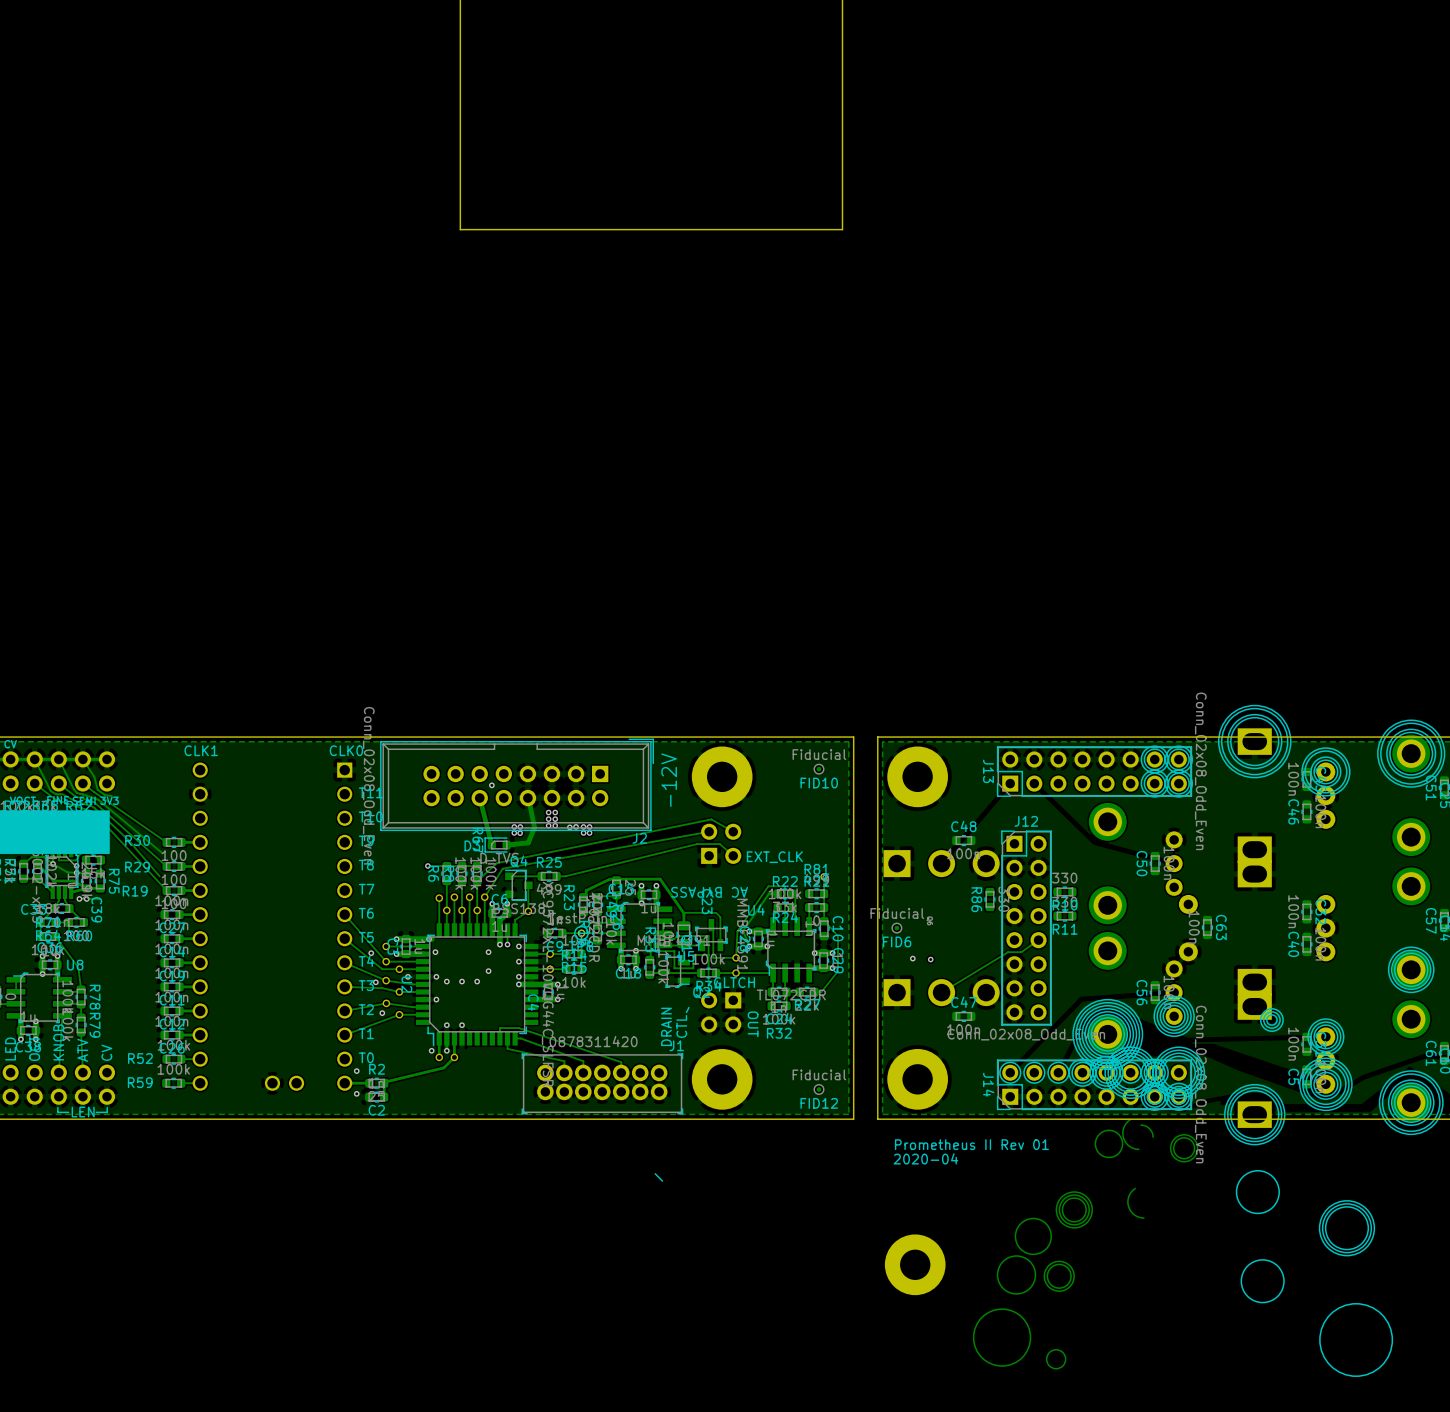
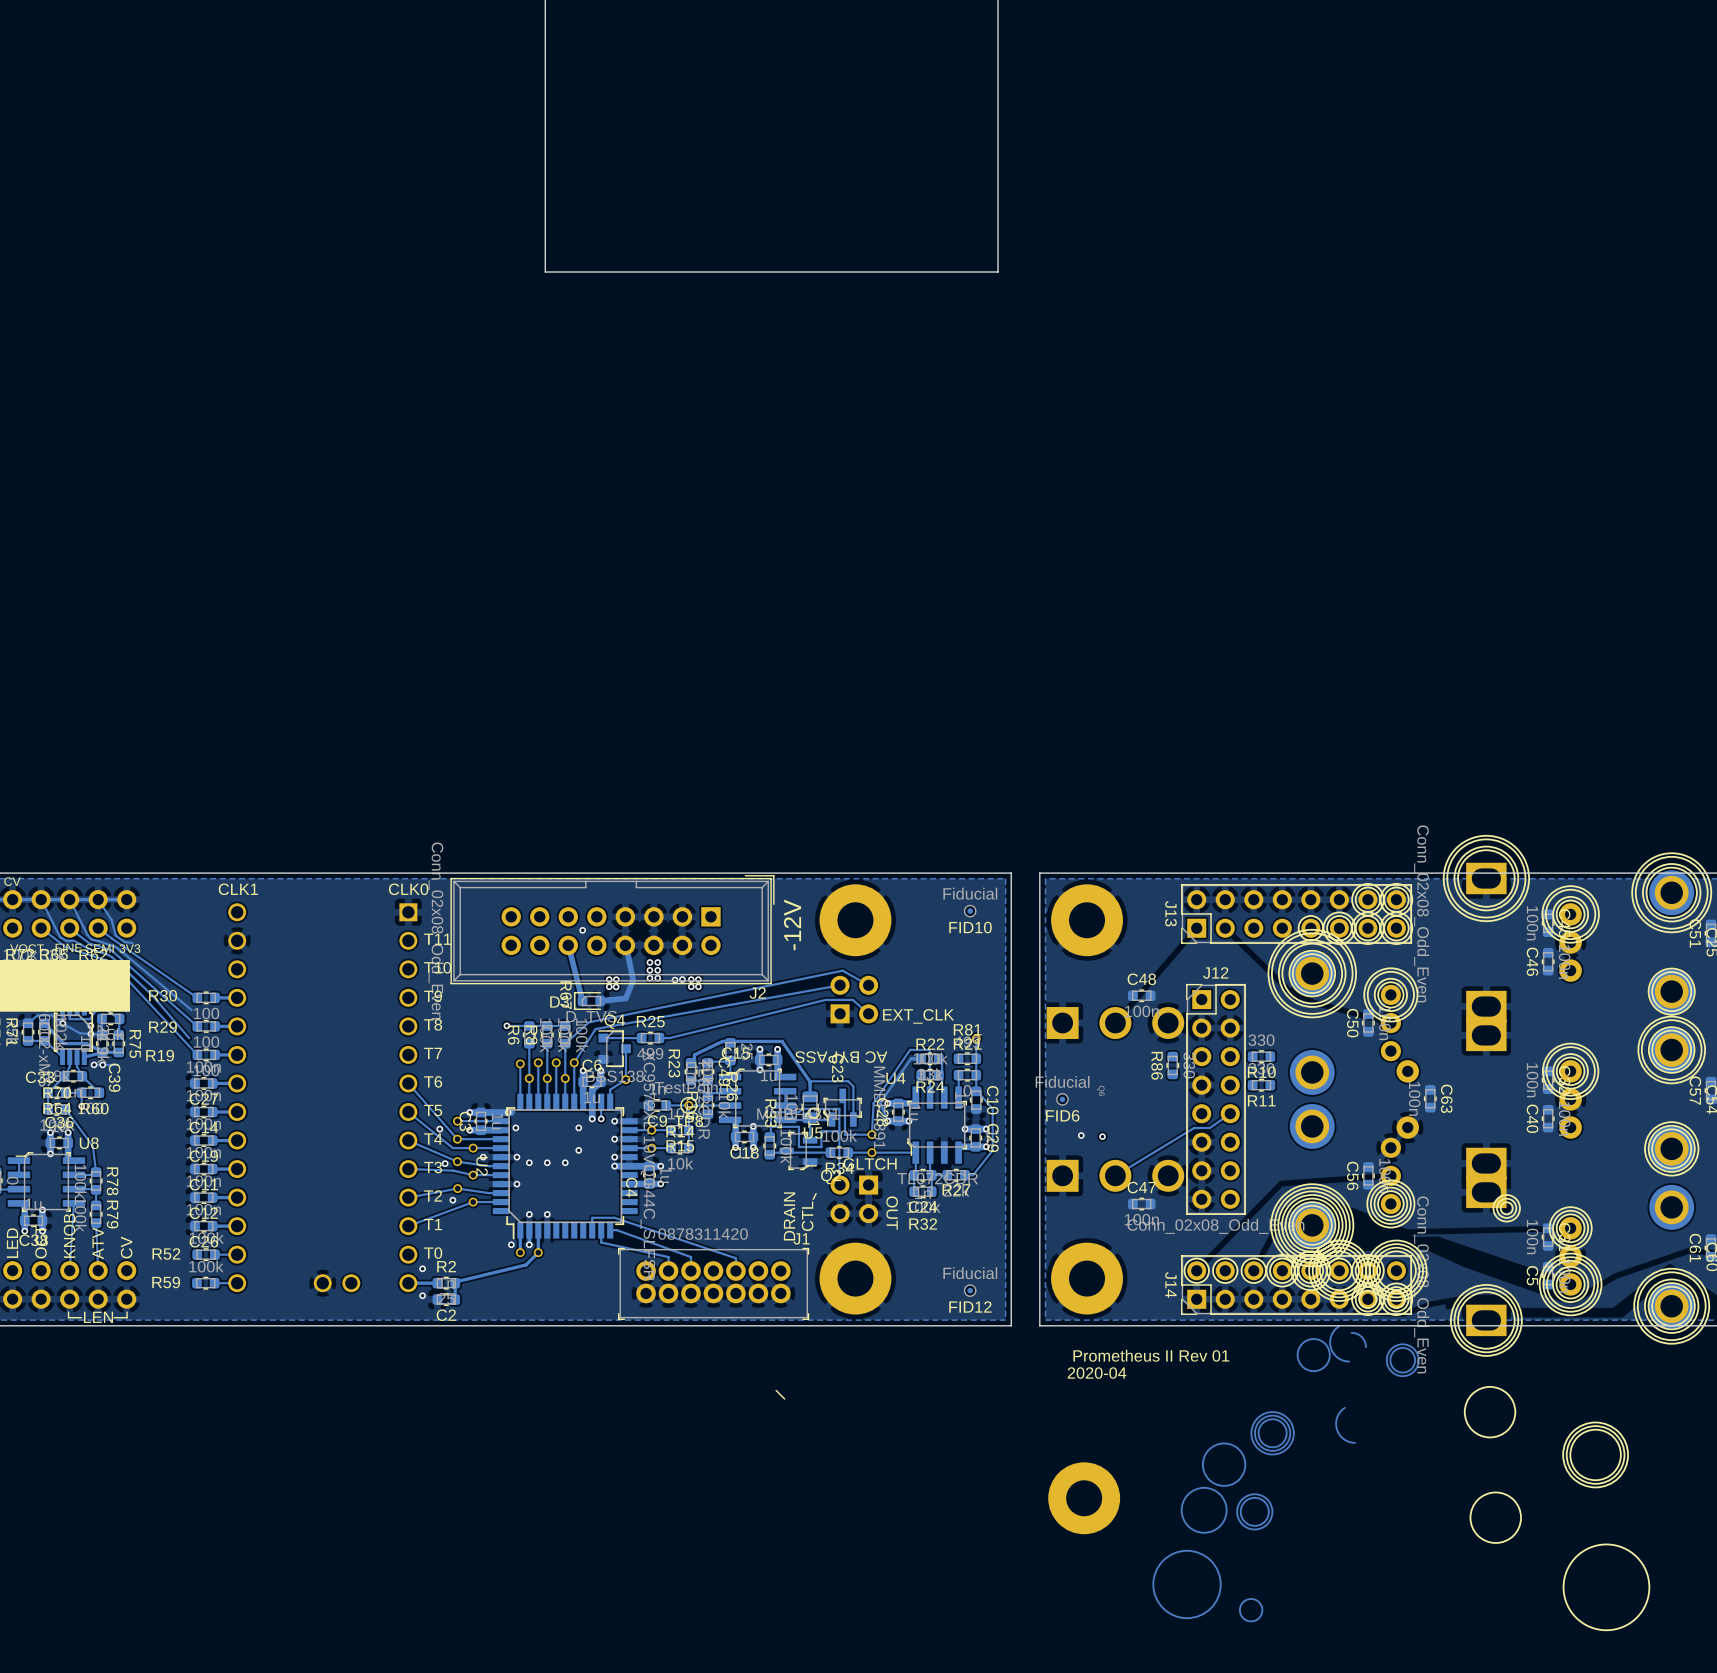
drawing: none -> [1267, 911, 1419, 1023]
drawing: none -> [1637, 967, 1706, 1085]
drawing: none -> [1541, 1042, 1600, 1101]

